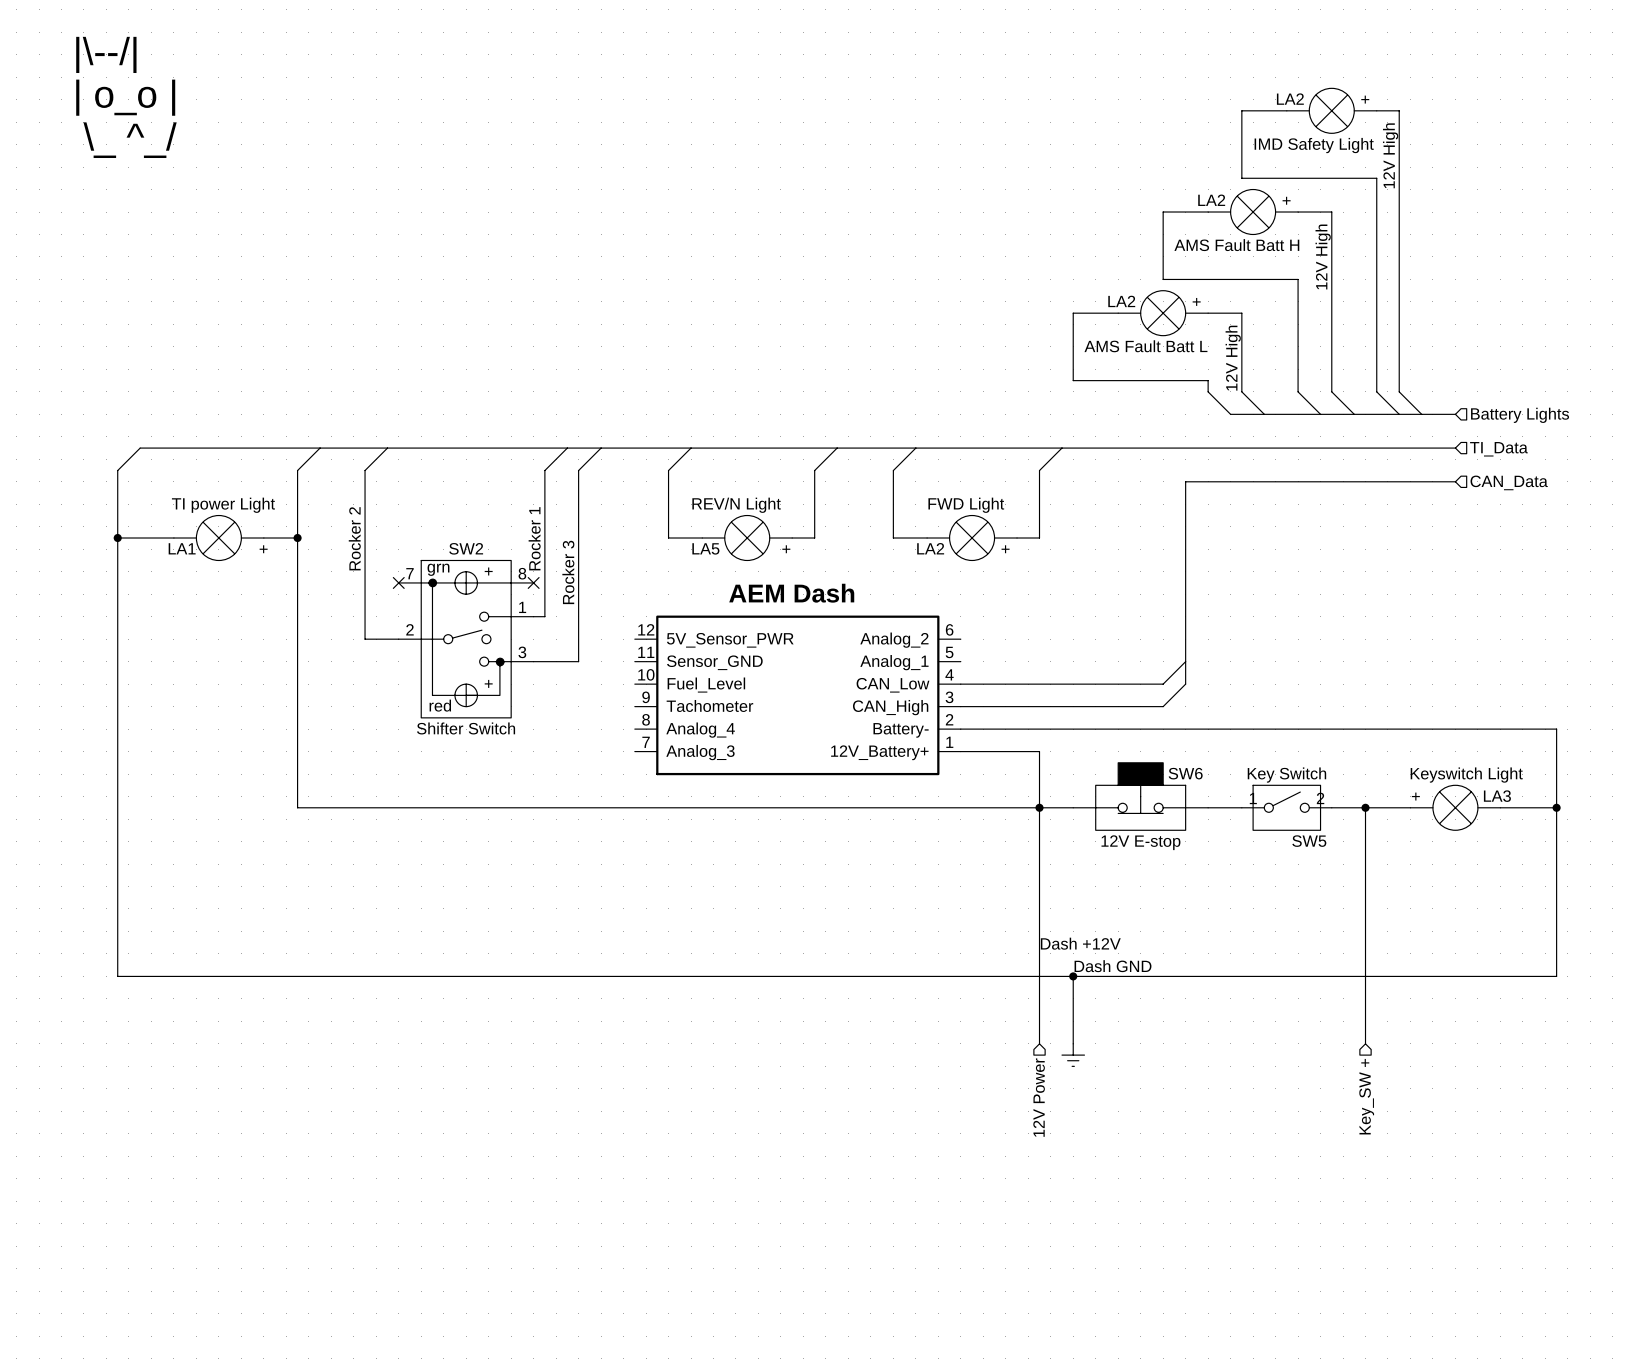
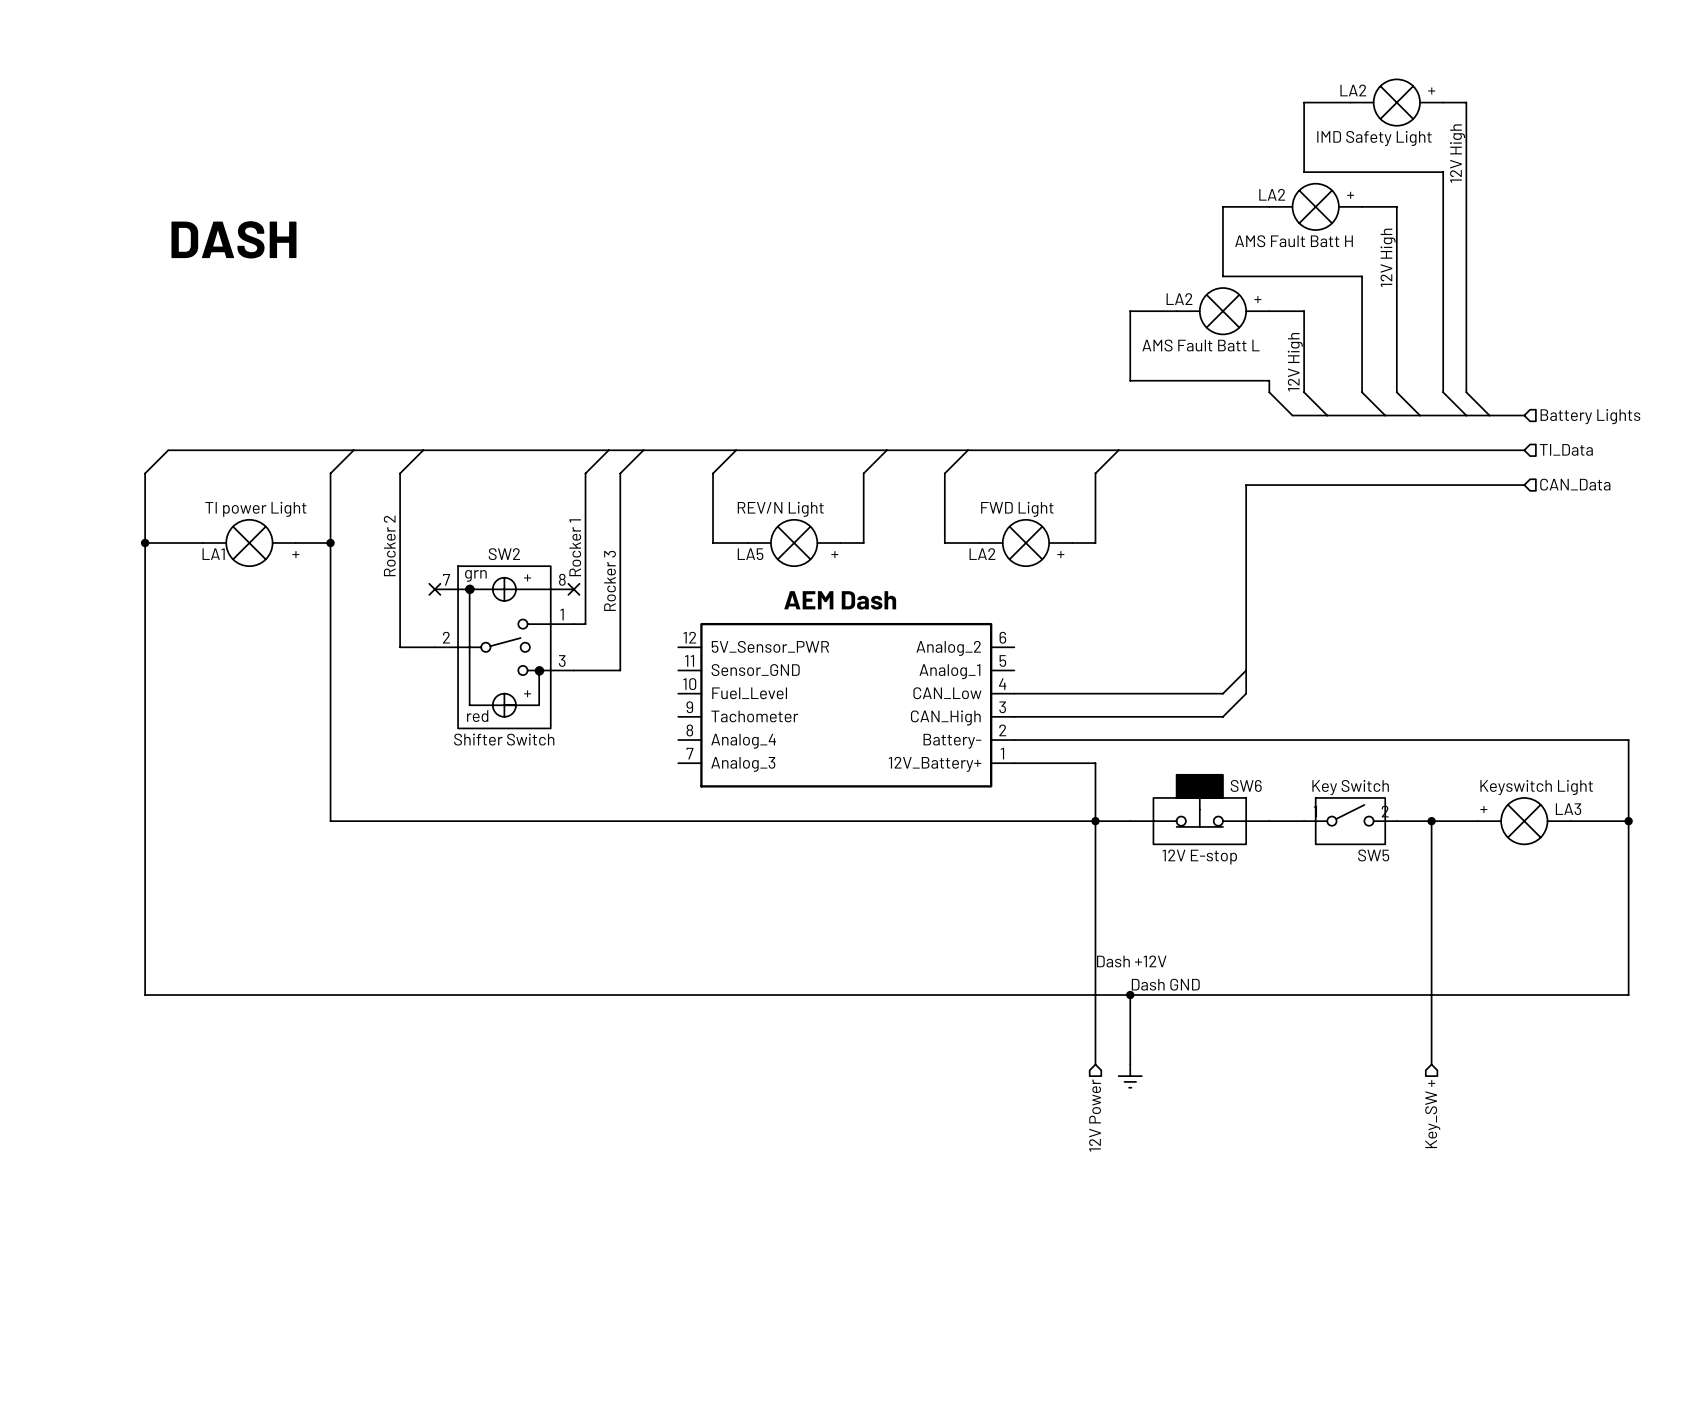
text: |\--/| (106, 54) -> none
text: | o_o | (125, 97) -> none
text: \_ ^_/ (130, 140) -> none
text: none -> DASH (233, 239)

